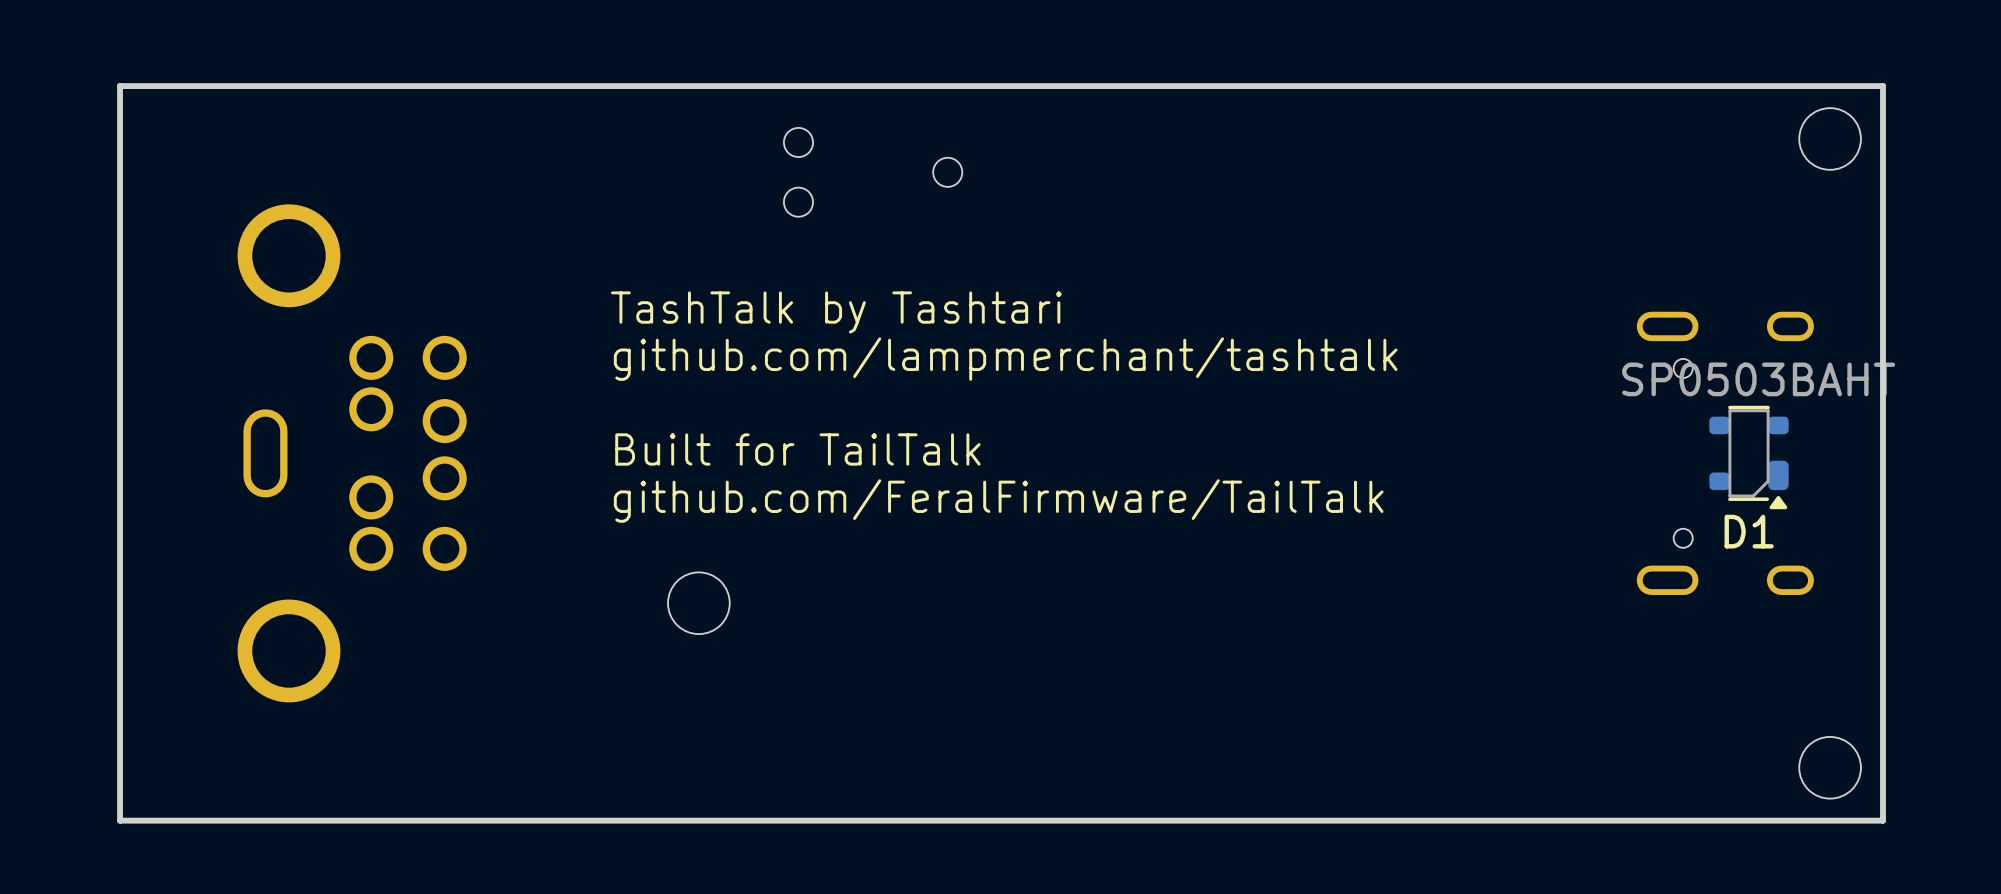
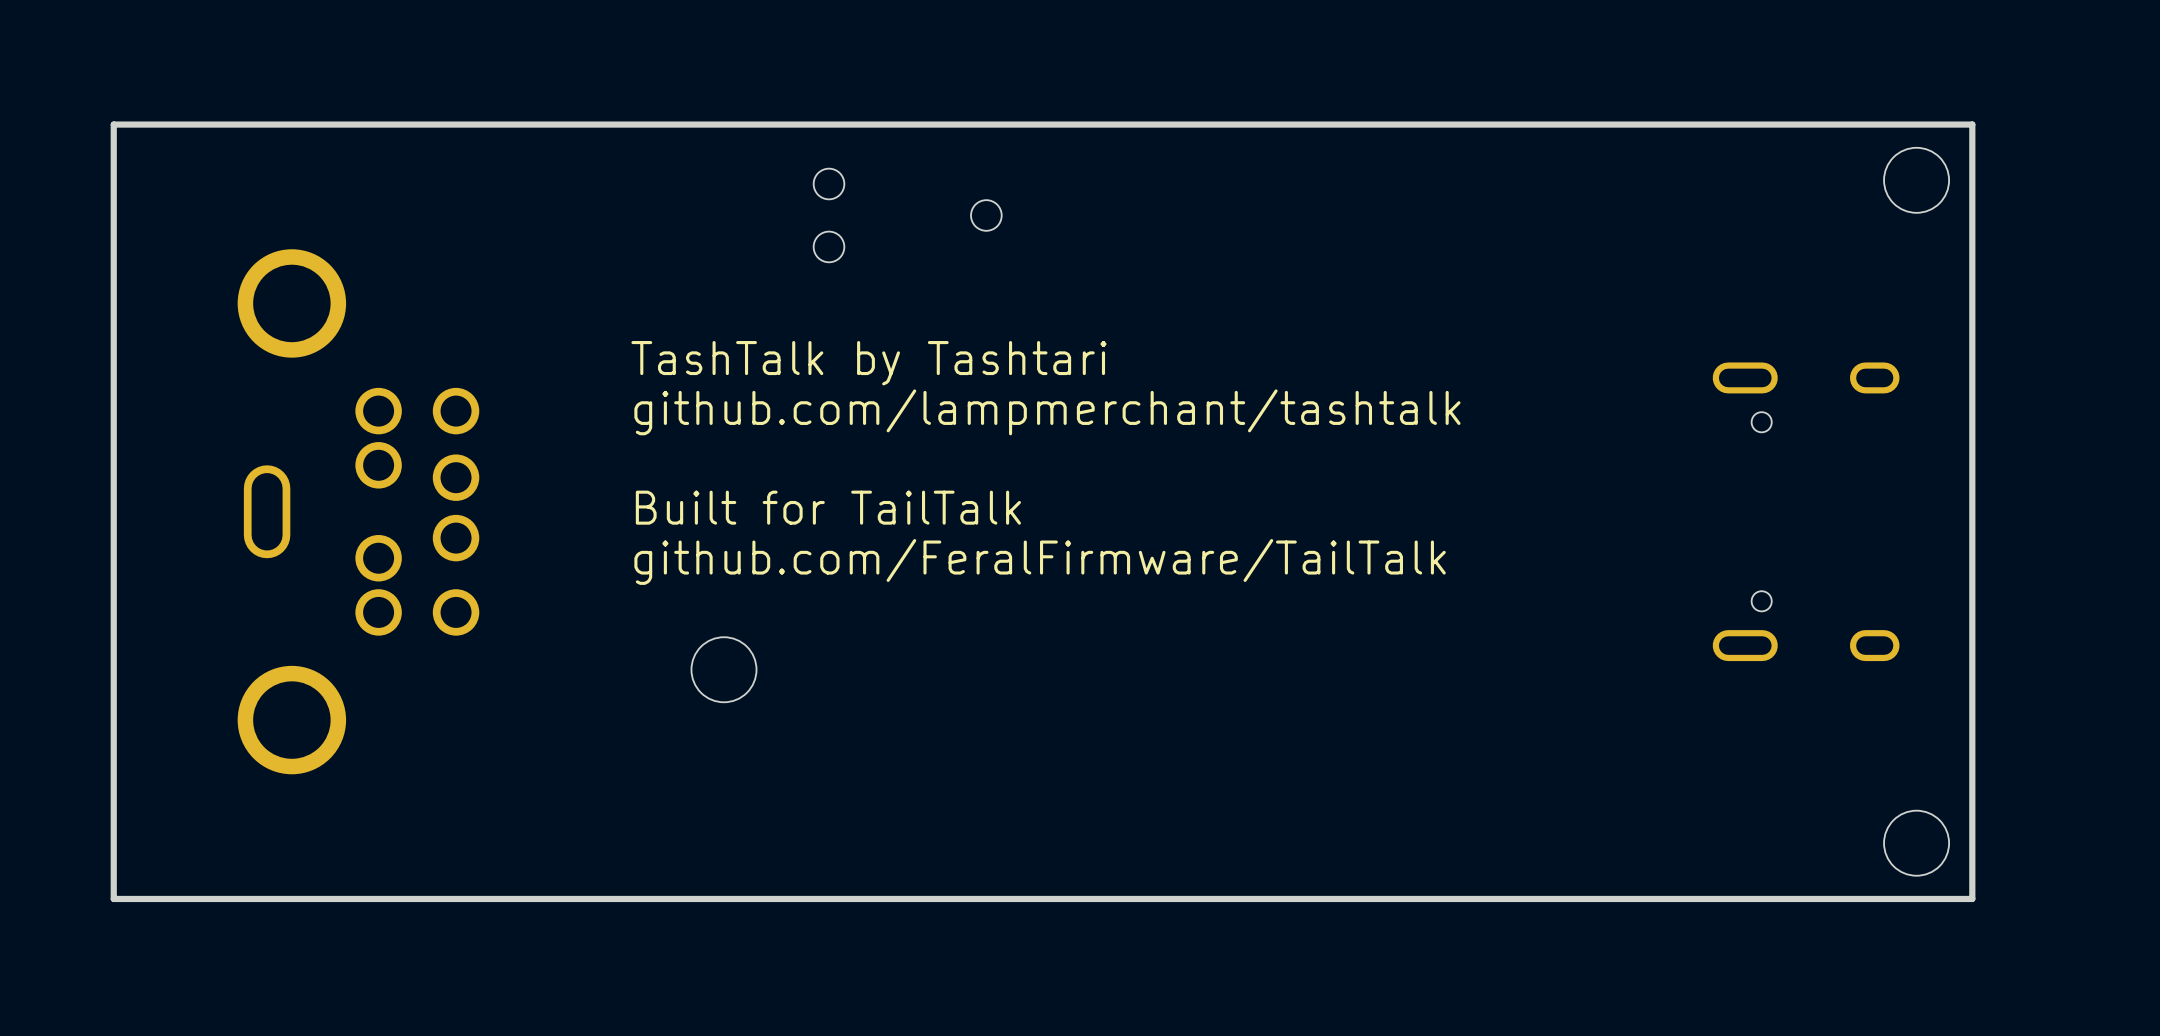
D1: SP0503BAHT (1749, 457) -> none

